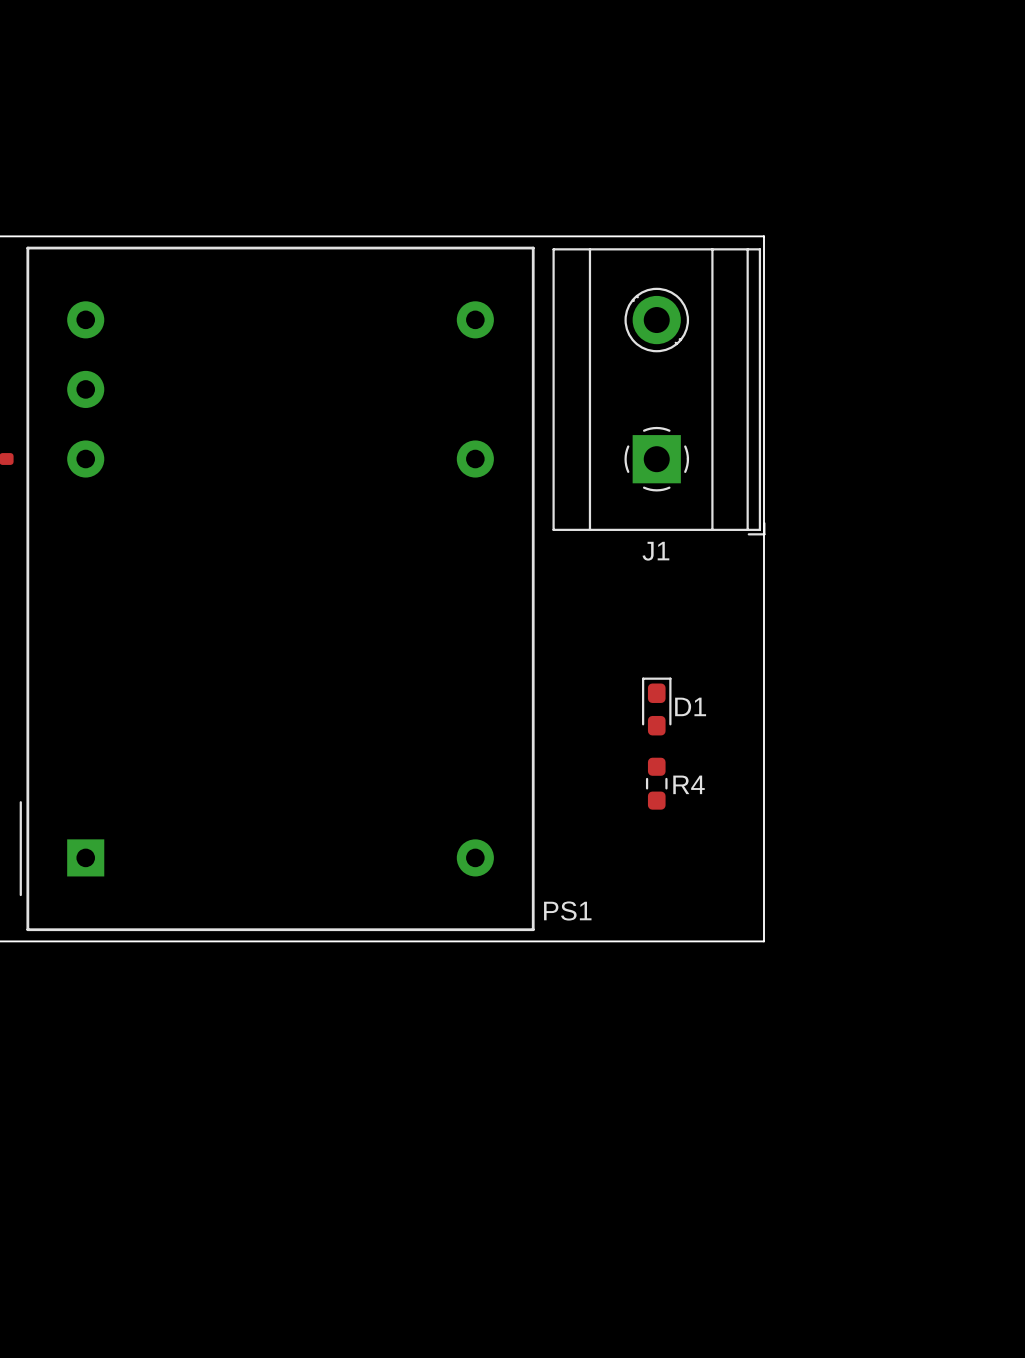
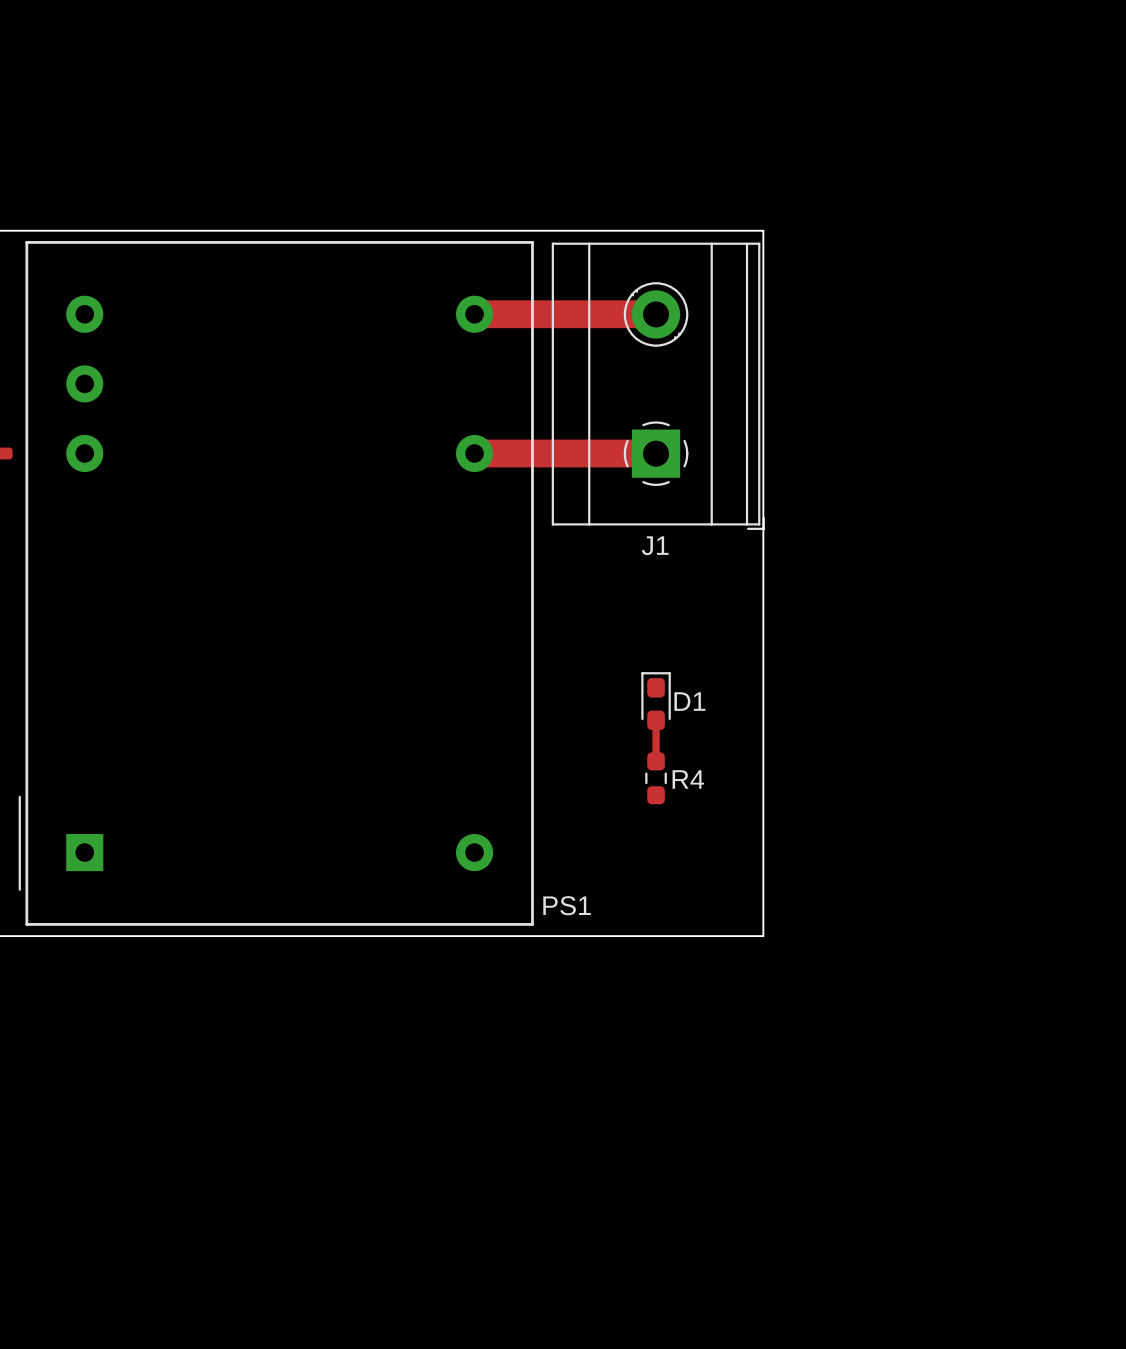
top track: none -> (474, 314) (655, 314)
top track: none -> (474, 453) (655, 453)
top track: none -> (656, 720) (656, 761)

